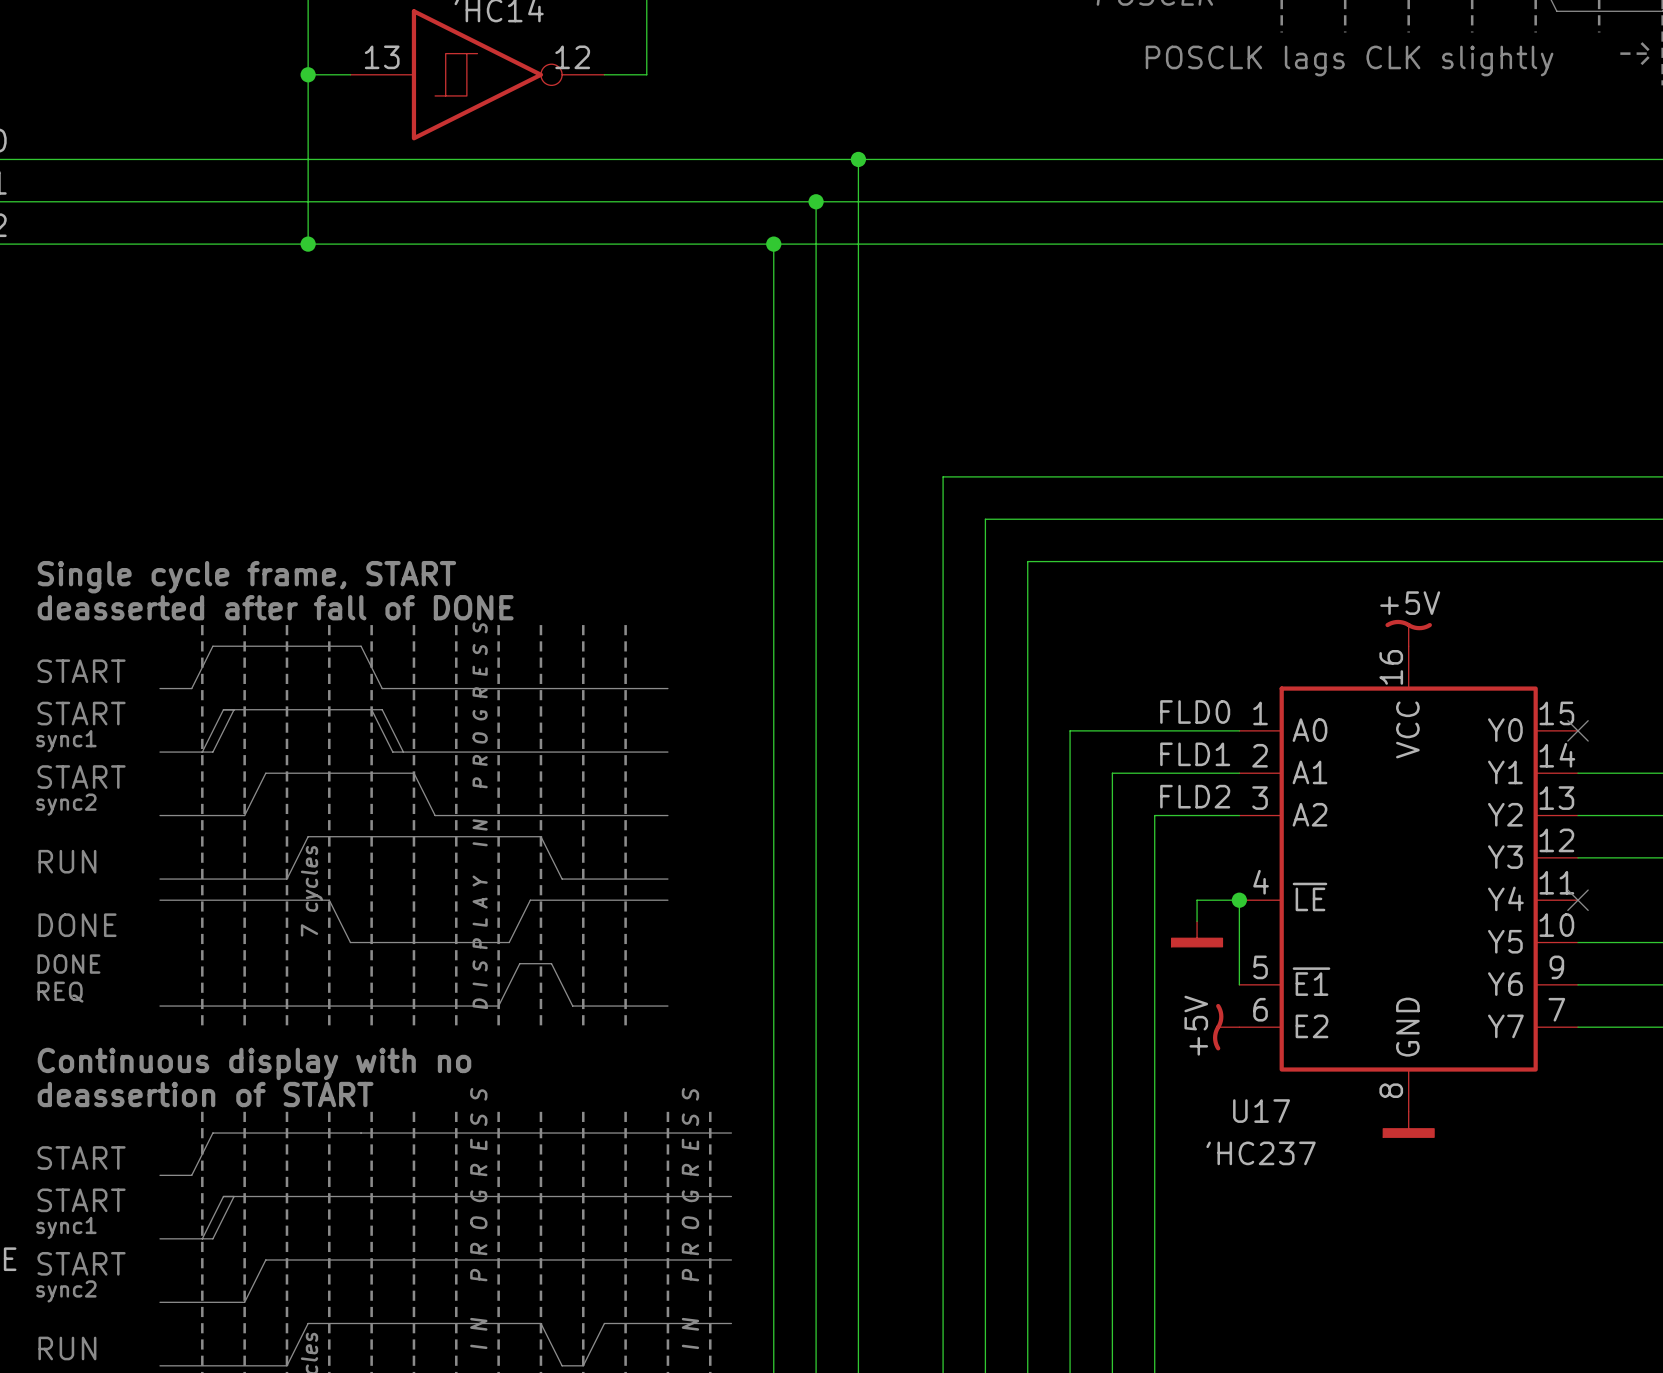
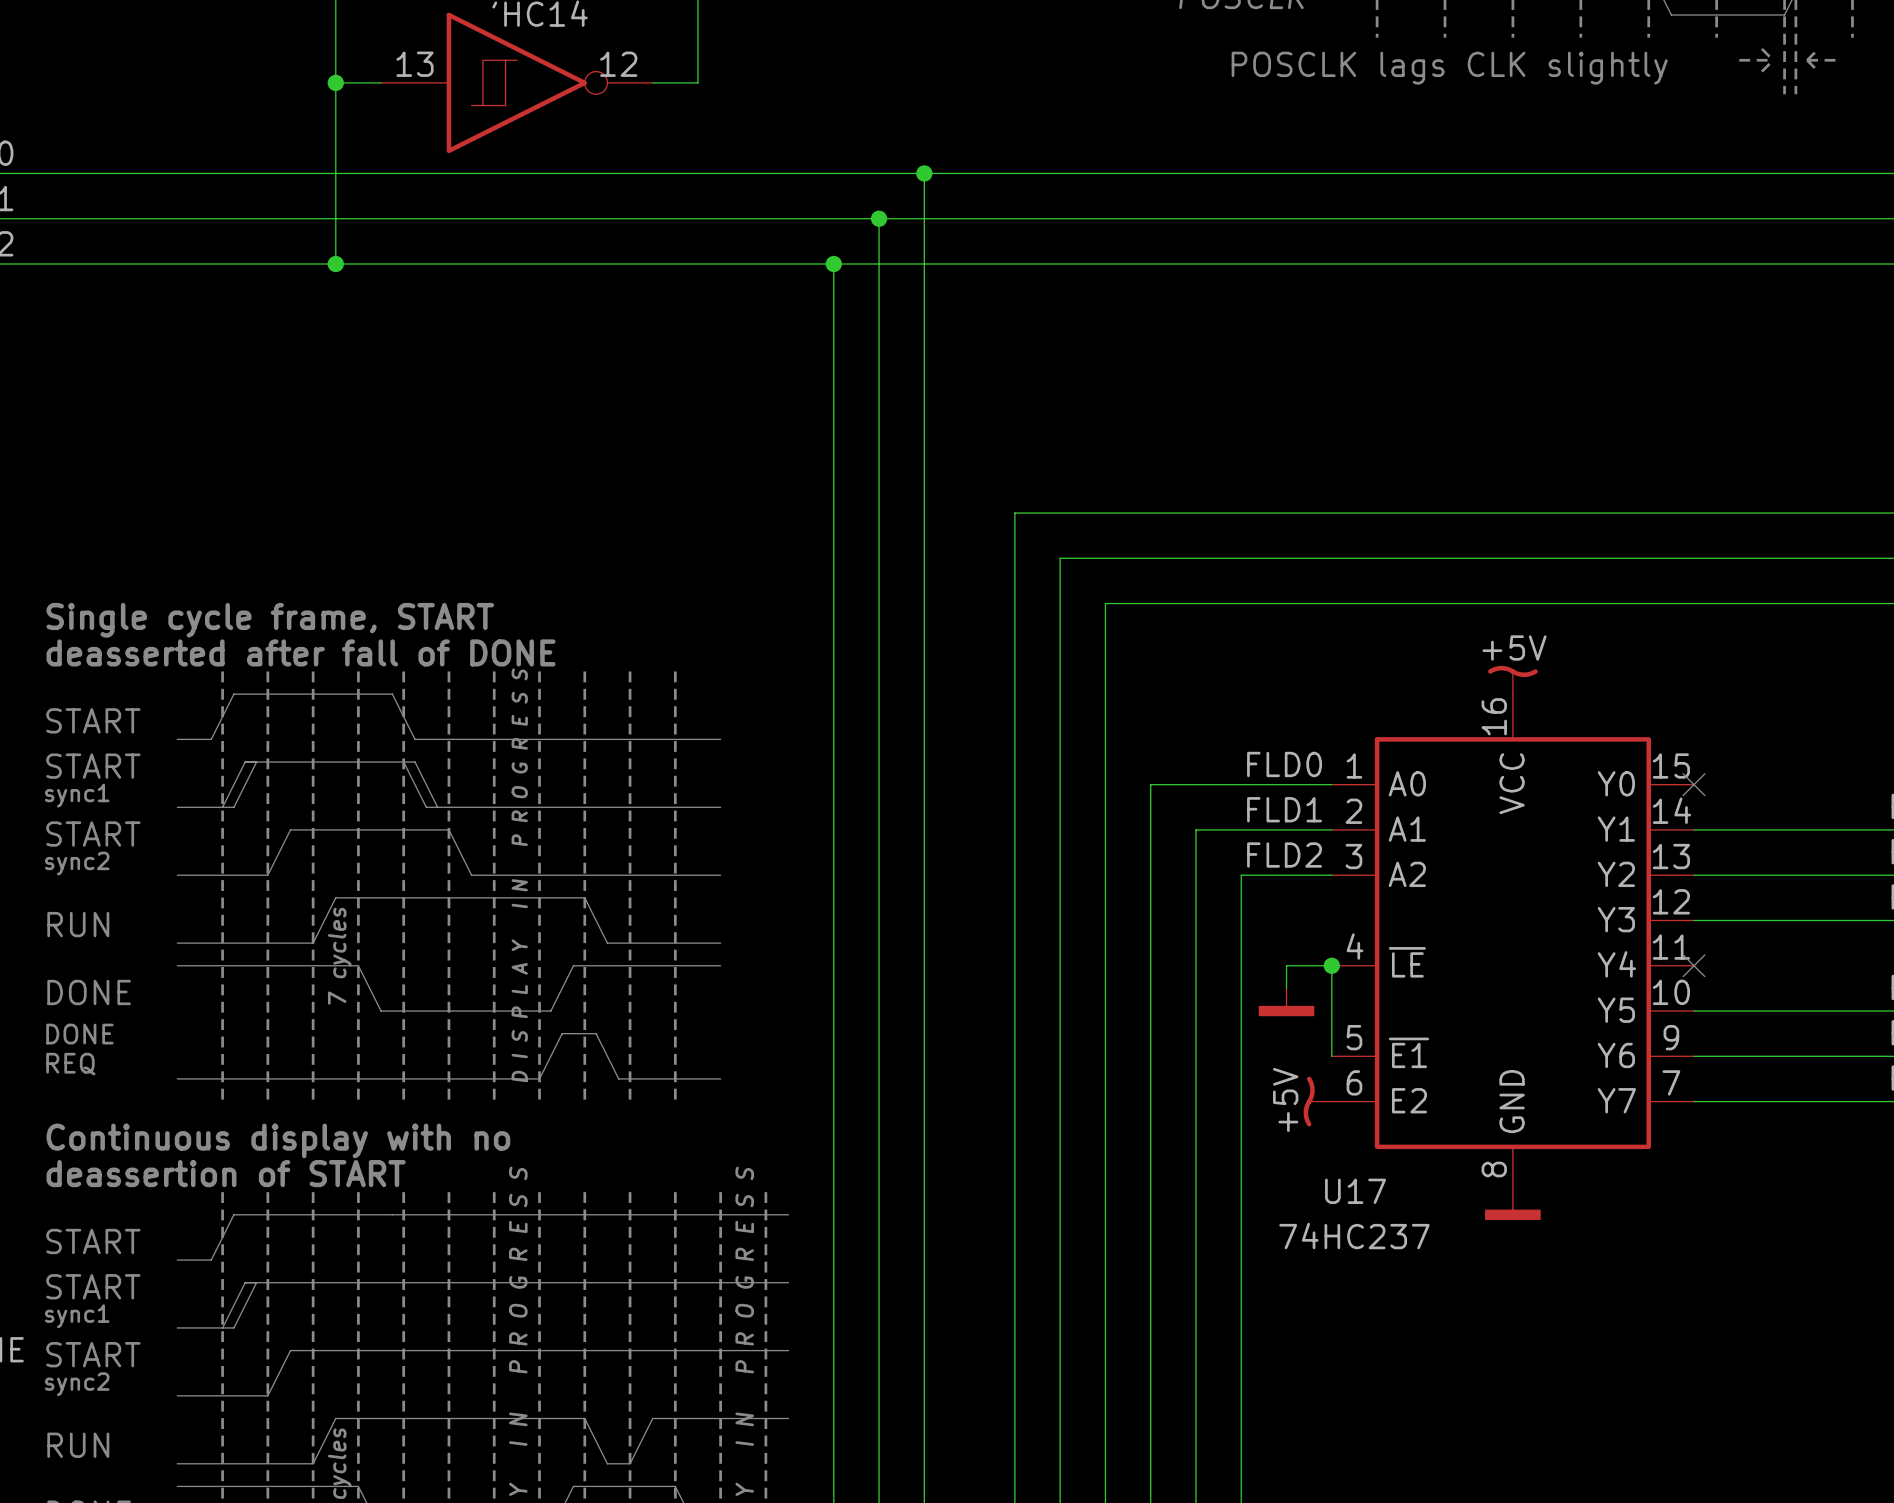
U17 value: 'HC237 (1261, 1153) -> 74HC237 (1354, 1236)

